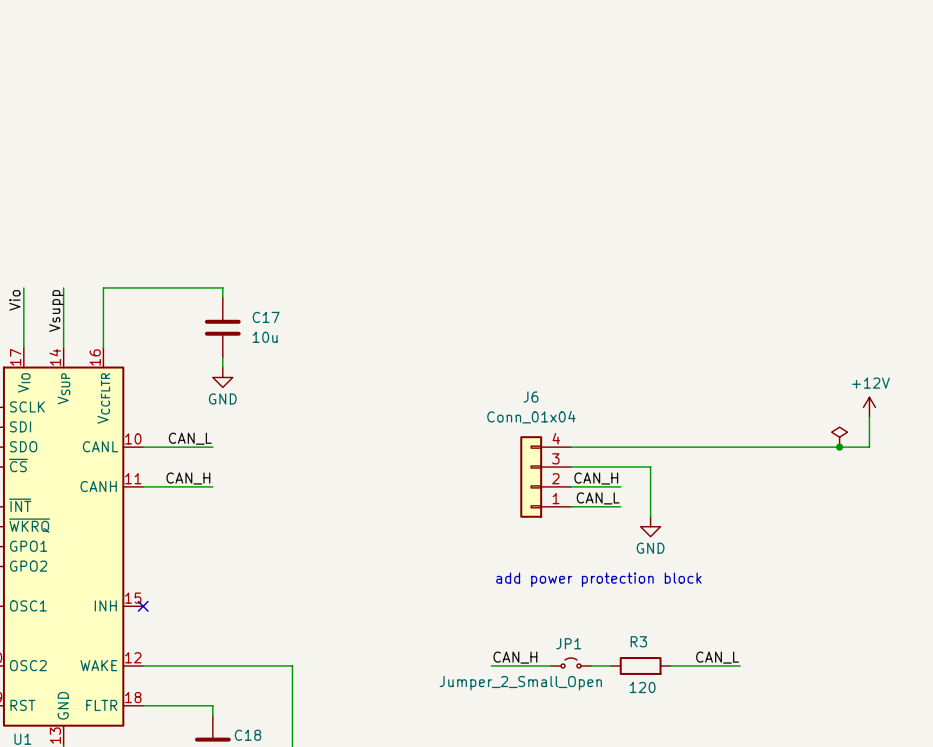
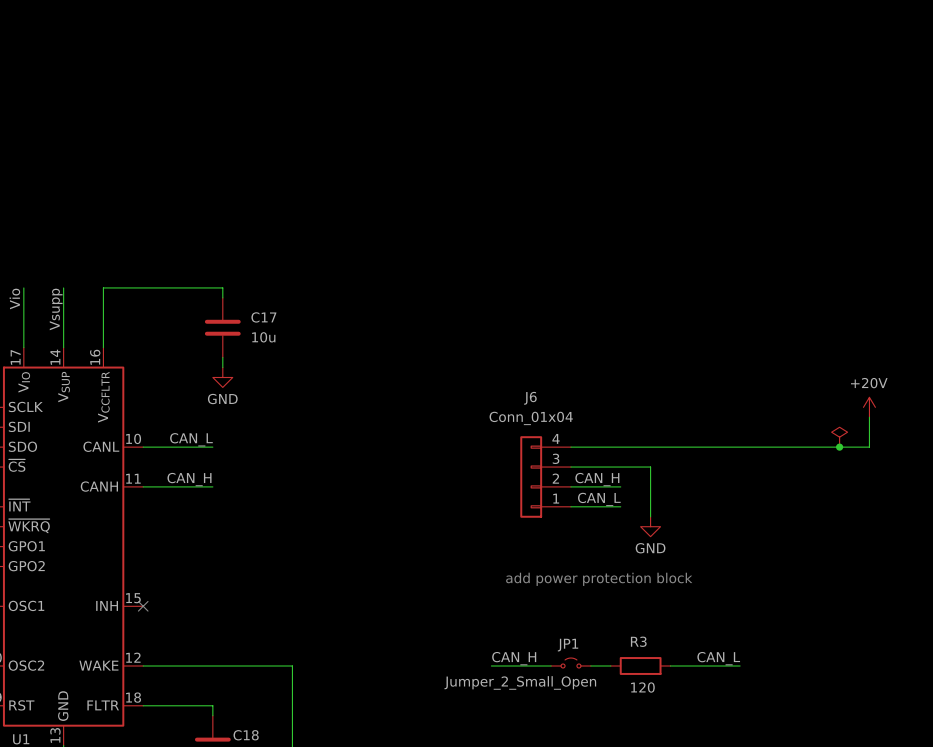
power symbol: +12V (869, 407) -> +20V (869, 407)

